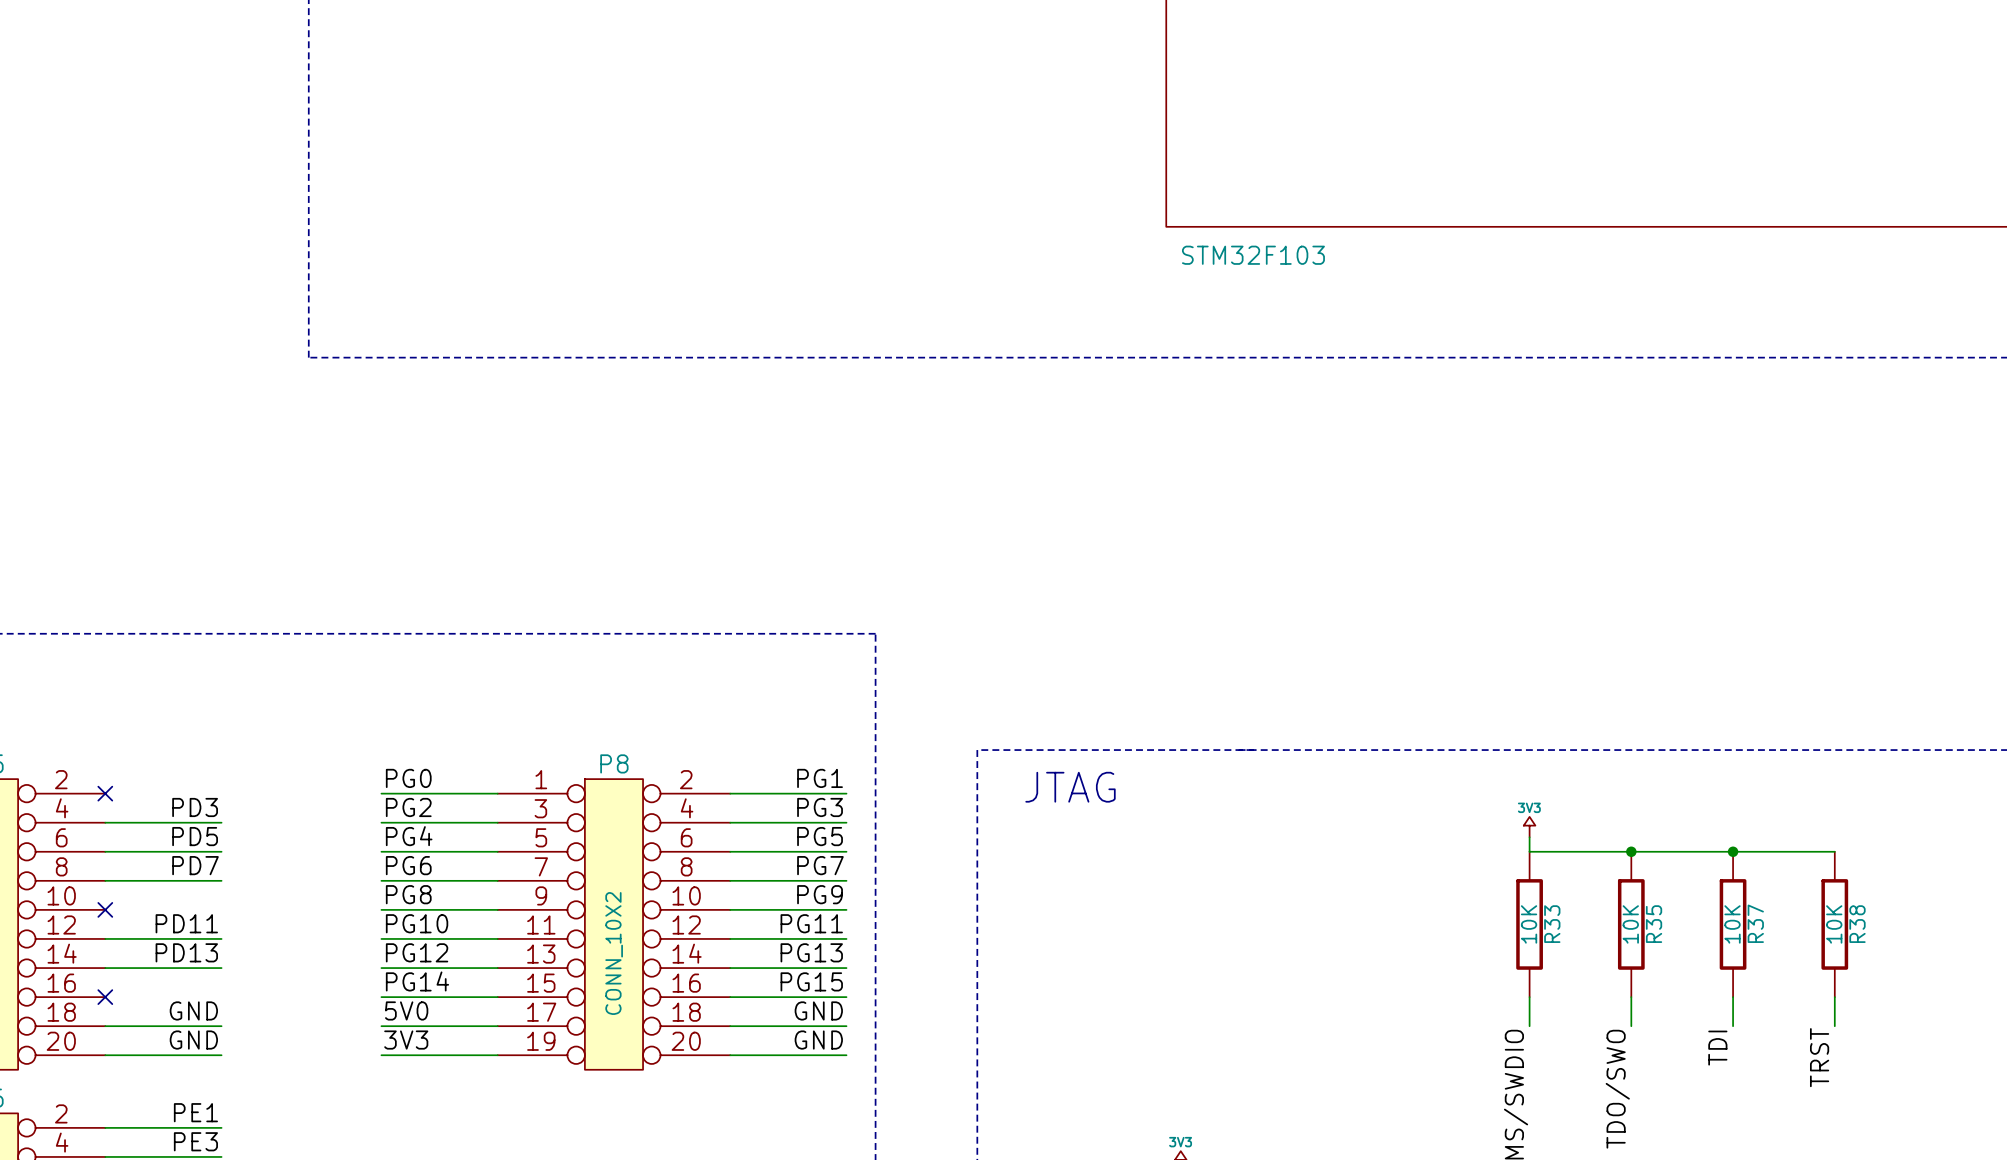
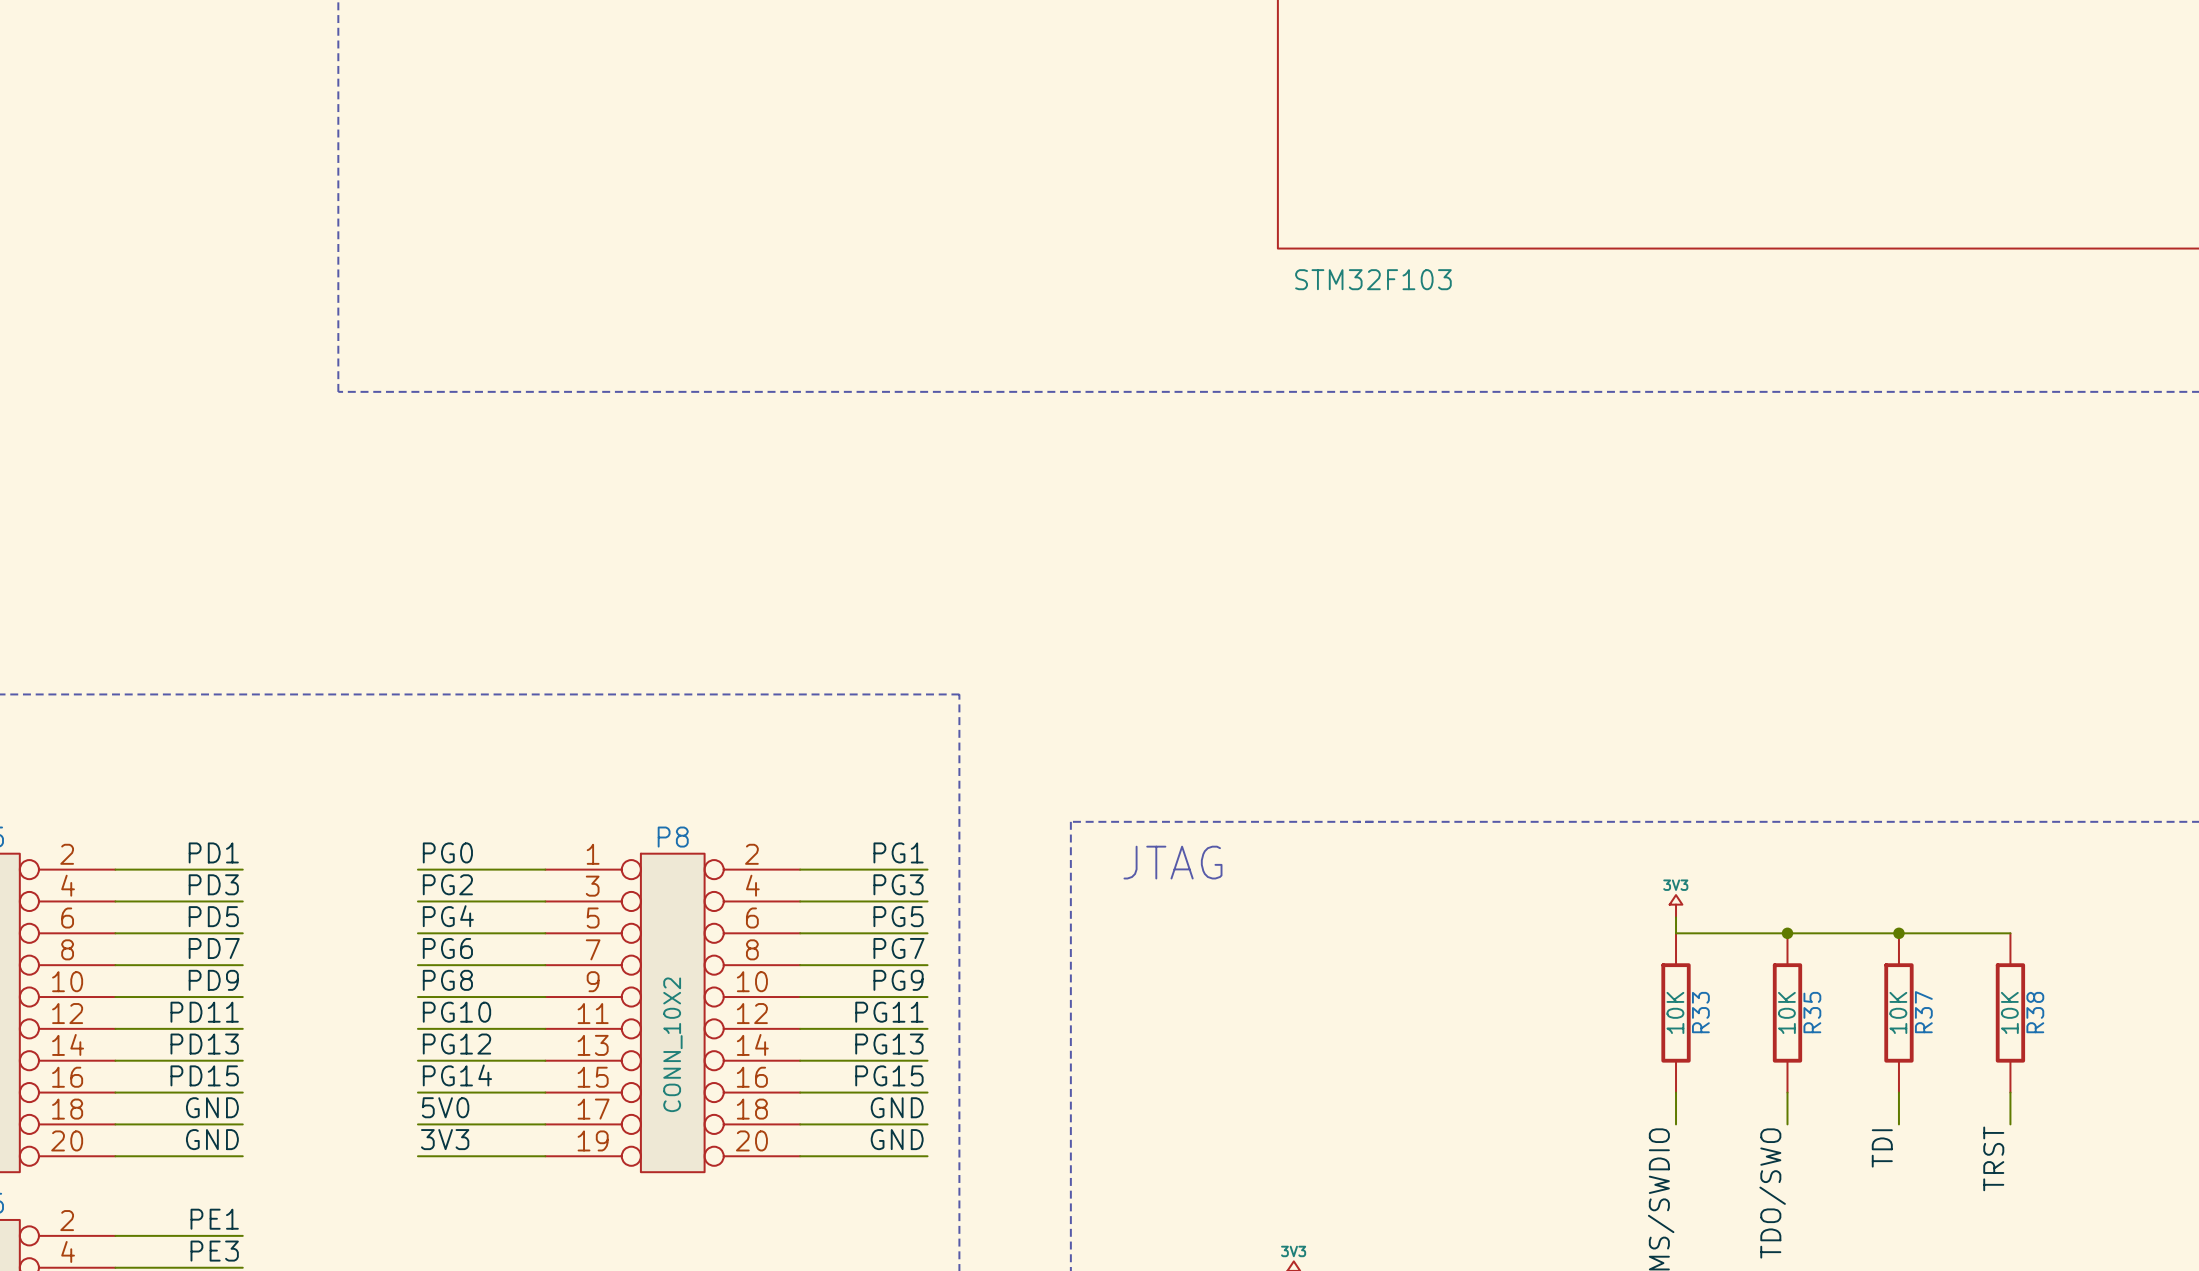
label: none -> PD1 (213, 852)
wire: none -> (115, 869) (242, 869)
no-connect mark: (105, 793) -> none
label: none -> PD9 (213, 980)
wire: none -> (115, 997) (242, 997)
no-connect mark: (105, 909) -> none
label: none -> PD15 (204, 1075)
wire: none -> (115, 1092) (242, 1092)
no-connect mark: (105, 997) -> none

